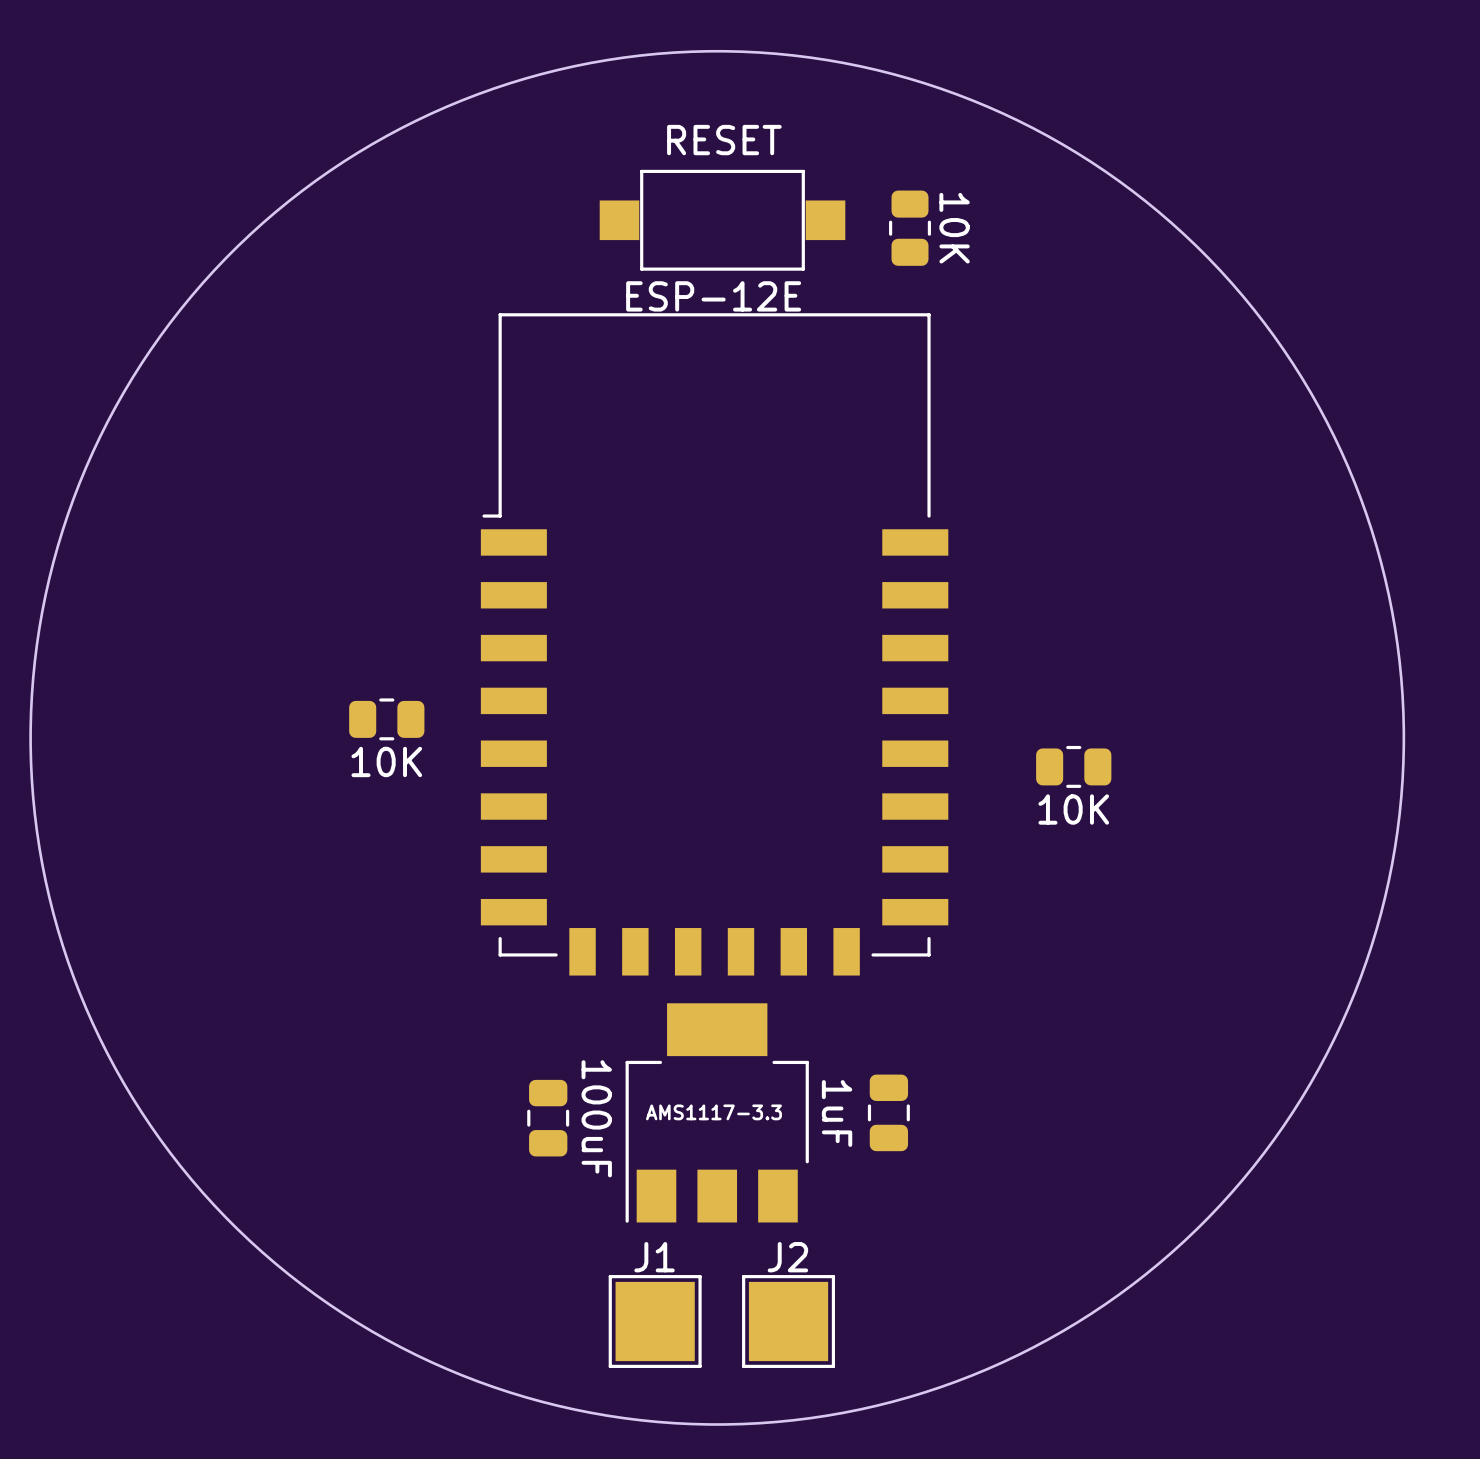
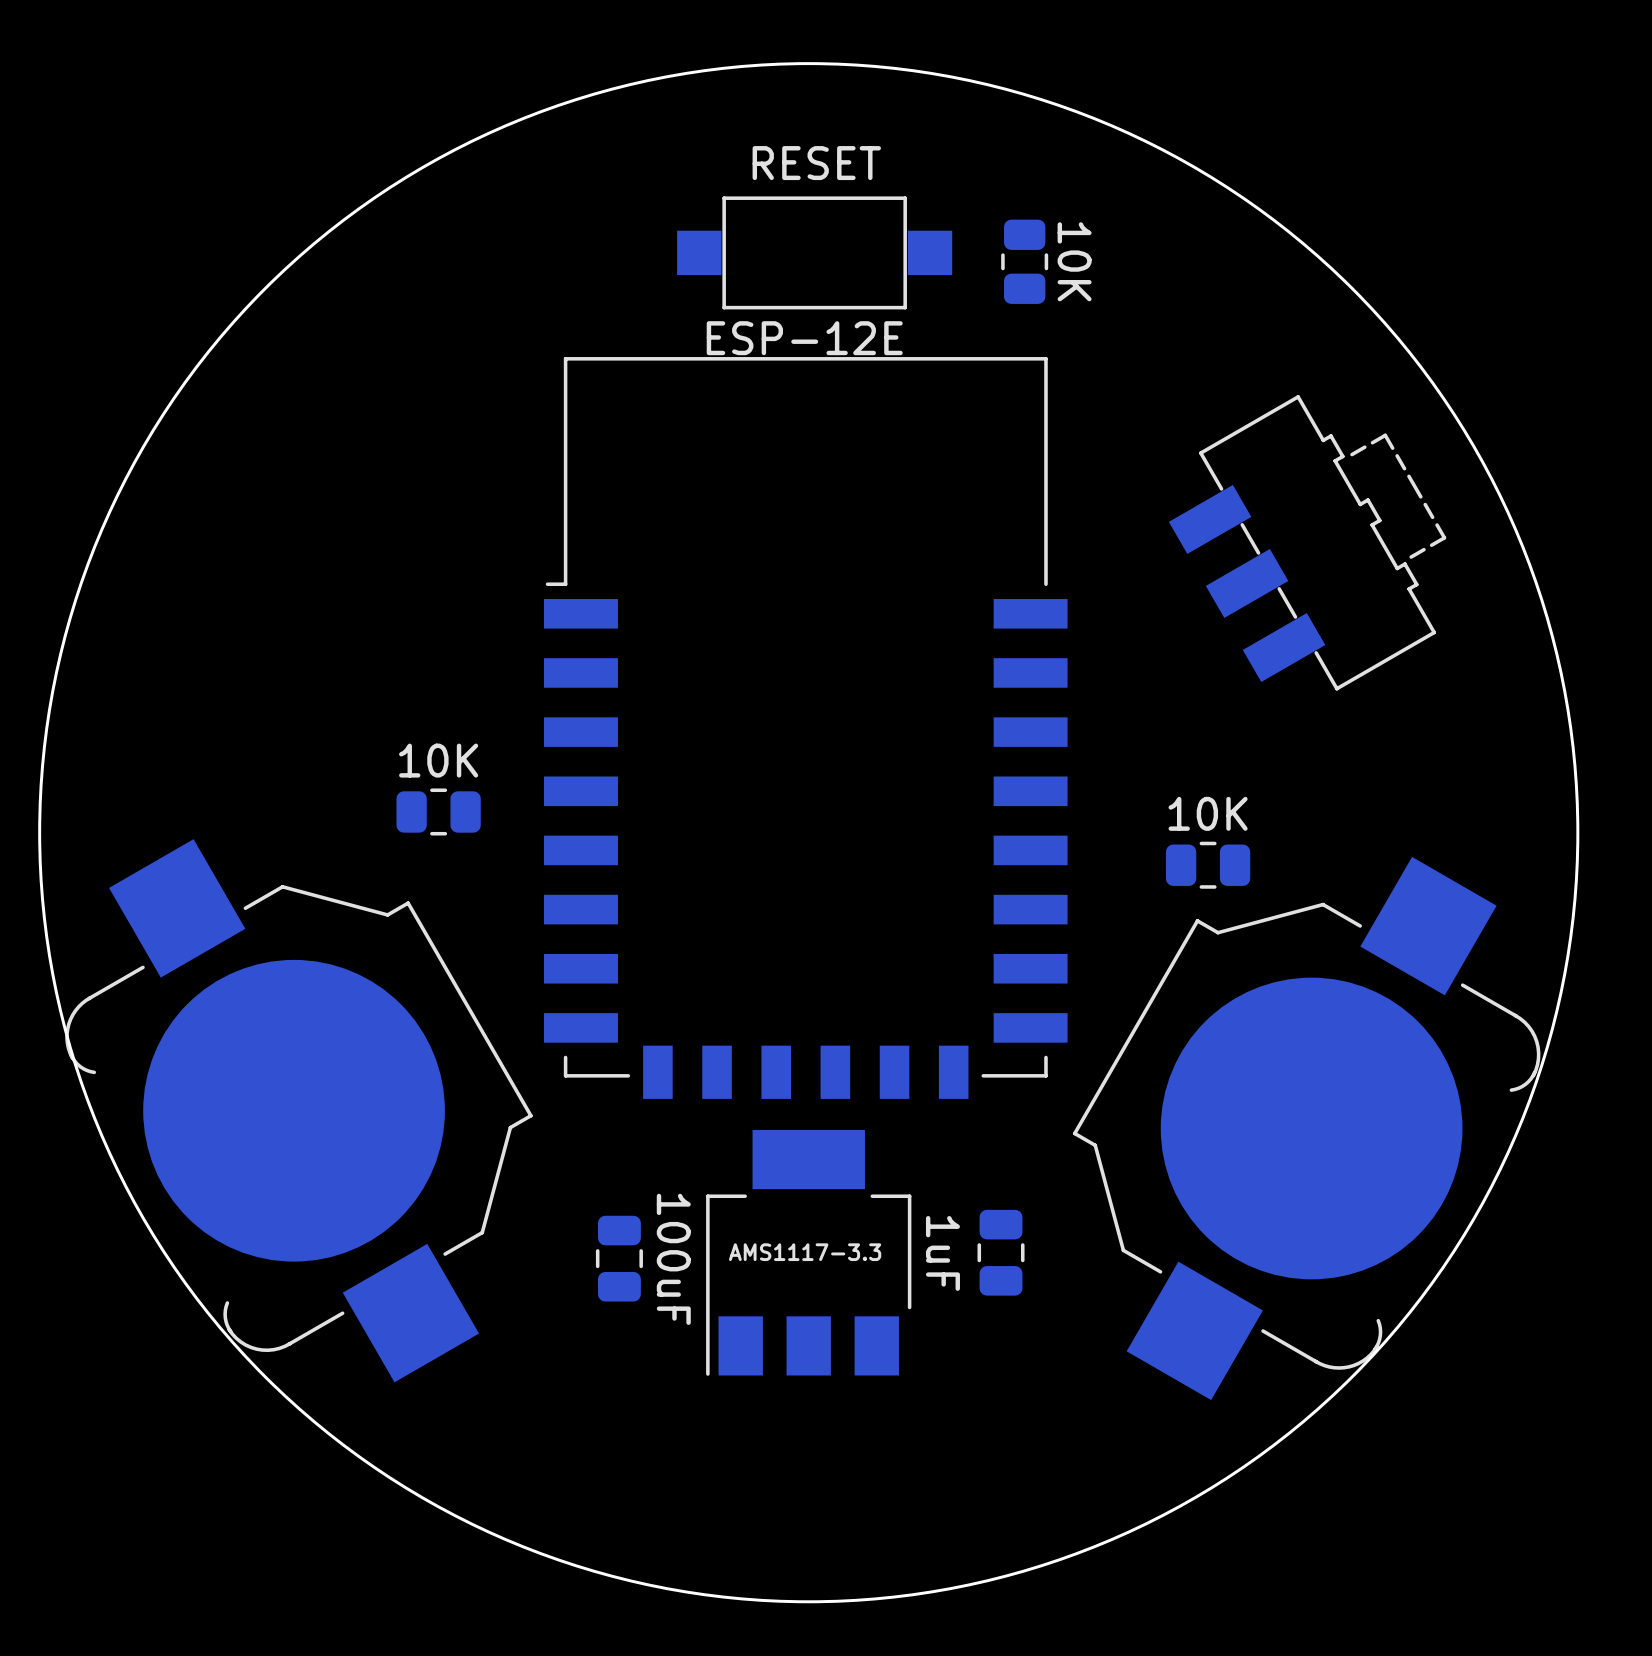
part: none -> (1307, 542)
part value position: 10K (386, 761) -> 10K (438, 760)
part value position: 10K (1073, 809) -> 10K (1208, 813)
part: none -> (298, 1110)
part: none -> (1306, 1128)
J1: (655, 1321) -> none
J2: (788, 1321) -> none

